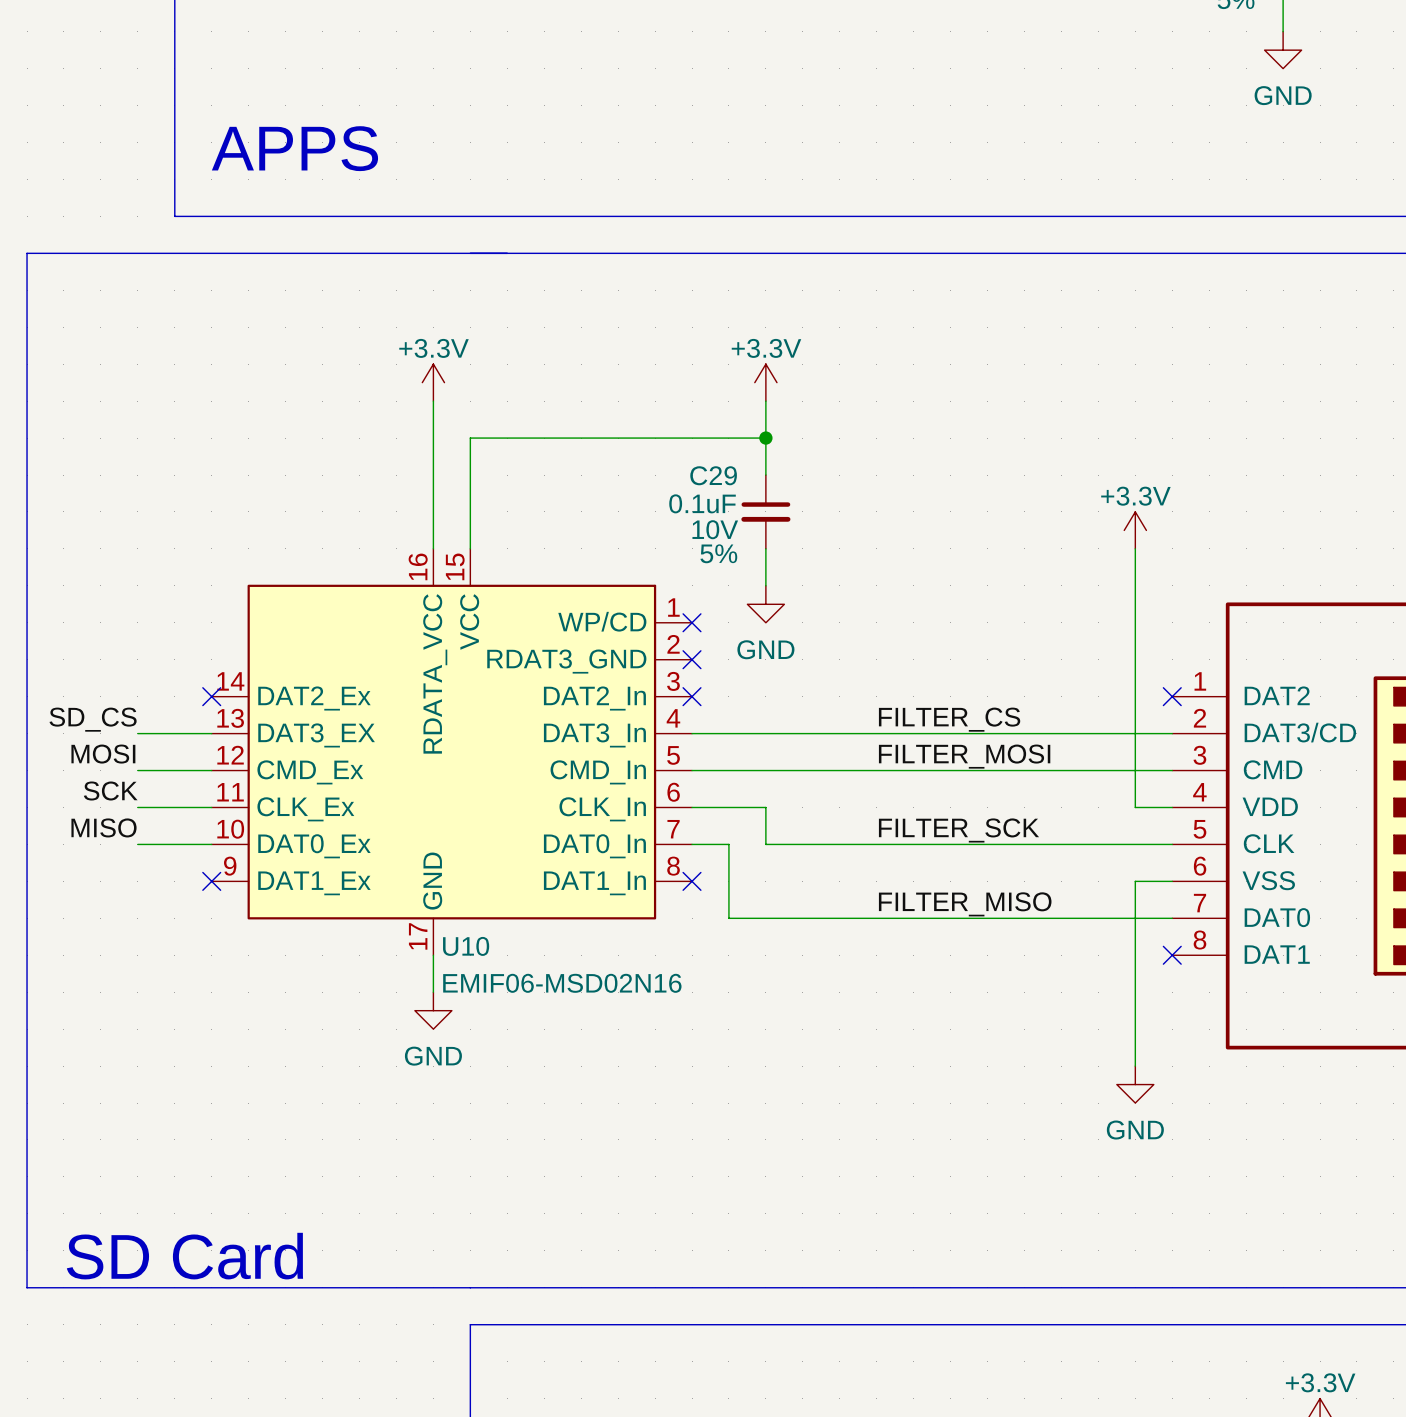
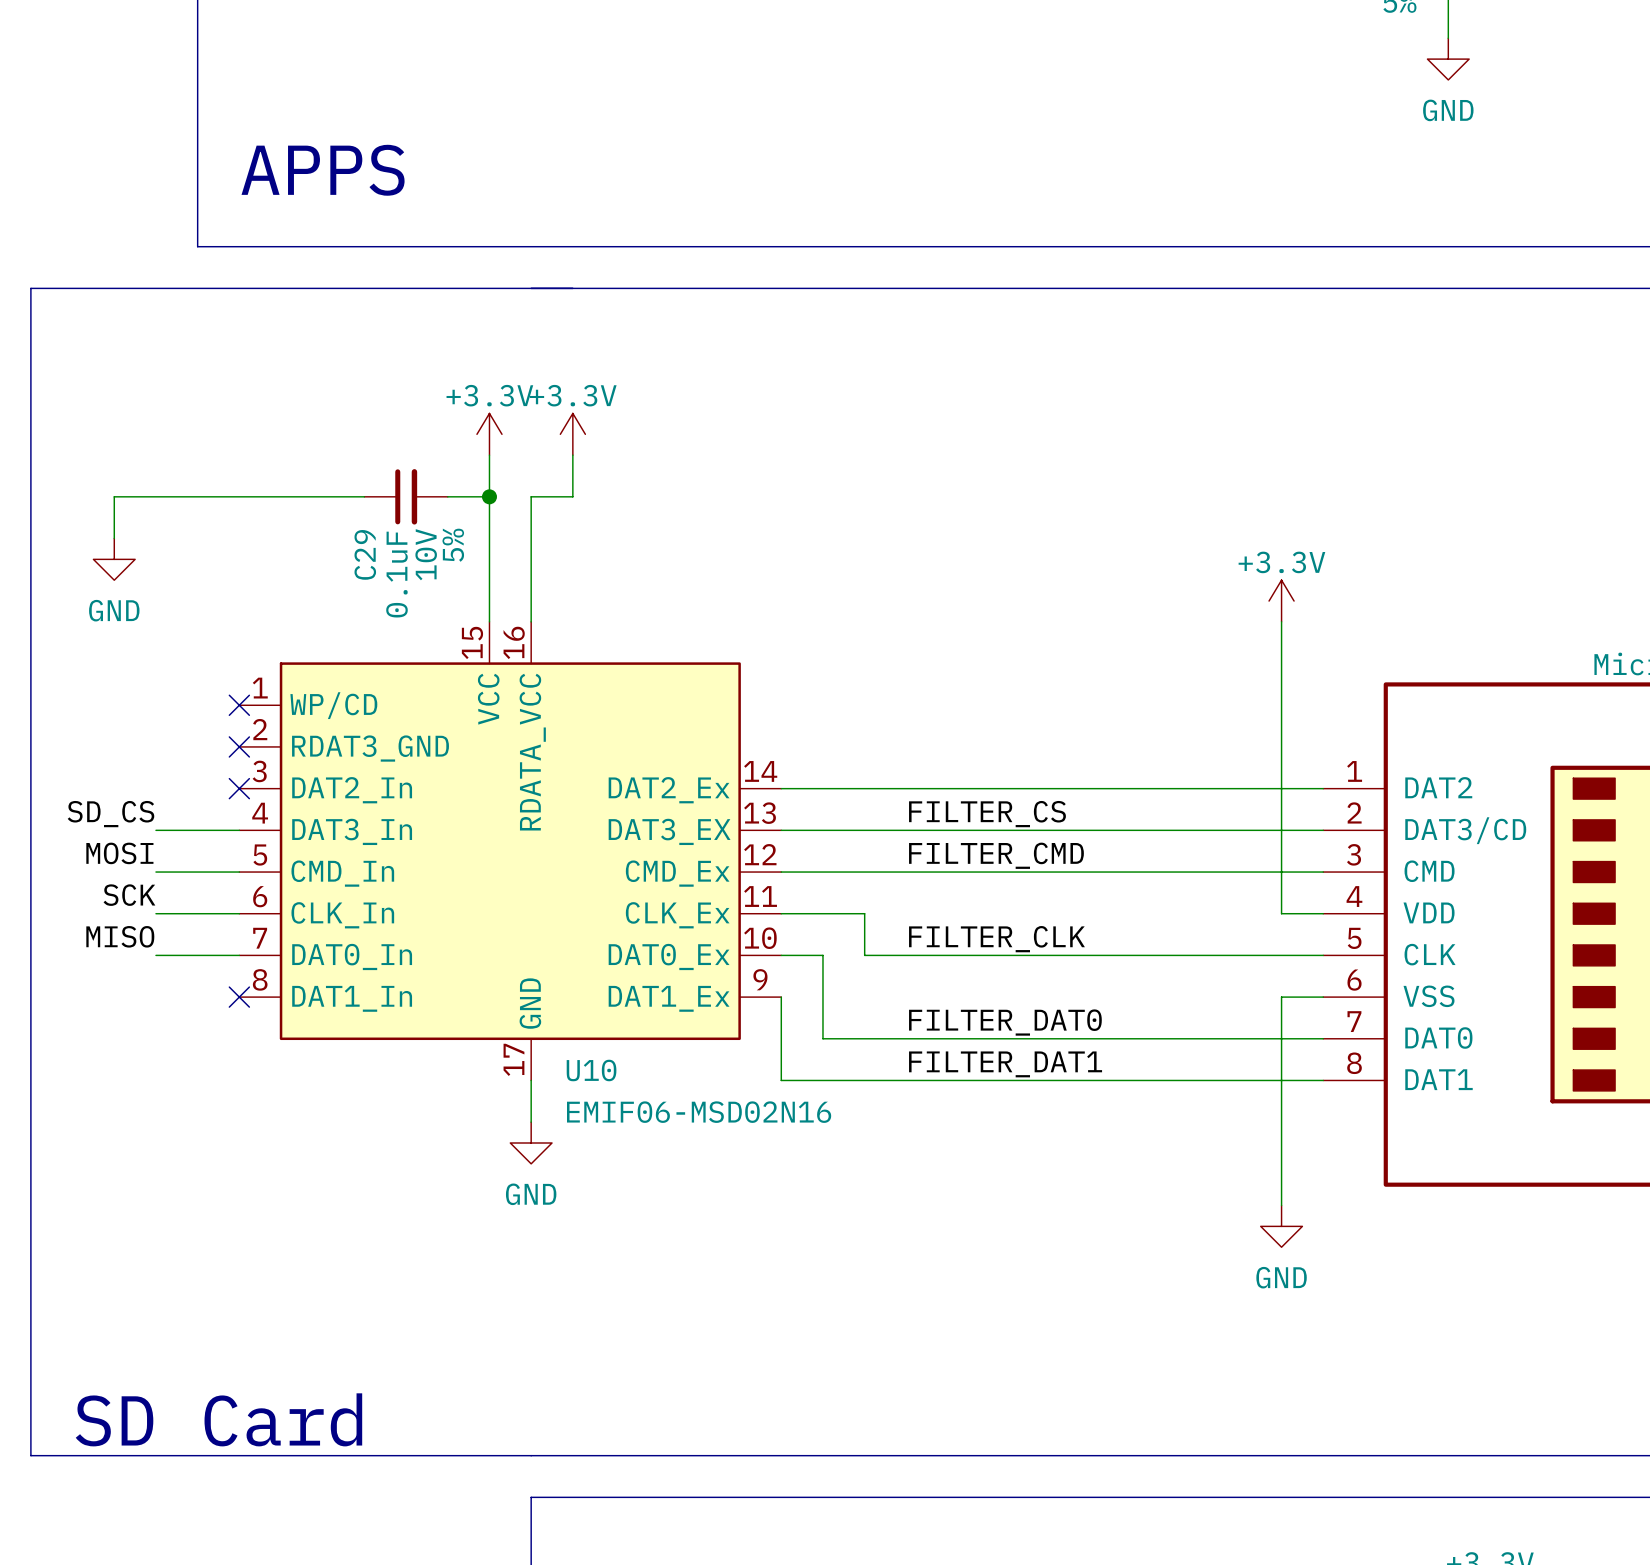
power symbol position: +3.3V (765, 382) -> +3.3V (572, 434)
wire: (765, 401) (765, 475) -> none
wire: none -> (364, 496) (114, 496) (114, 538)
wire: none -> (447, 496) (489, 496)
junction: none -> (489, 496)
wire: (507, 438) (765, 438) -> (572, 496) (572, 455)
junction: (765, 438) -> none
power symbol: none -> GND (114, 559)
C29 position: (765, 511) -> (406, 496)
C29 rotation: 0° (765, 512) -> 90° counterclockwise (406, 496)
wire: (765, 548) (765, 585) -> none
power symbol: GND (765, 604) -> none
no-connect mark: none -> (239, 705)
no-connect mark: (692, 622) -> none
no-connect mark: none -> (239, 746)
no-connect mark: (692, 659) -> none
wire: none -> (781, 788) (1323, 788)
no-connect mark: (692, 696) -> none
no-connect mark: (1172, 696) -> none
label position: FILTER_CS (949, 719) -> FILTER_CS (987, 814)
U10 flip: as is (451, 752) -> left-right (510, 851)
label: FILTER_MOSI (964, 756) -> FILTER_CMD (996, 855)
label: FILTER_SCK (958, 830) -> FILTER_CLK (996, 939)
wire: none -> (781, 997) (781, 1080) (1323, 1080)
no-connect mark: (692, 881) -> none
label: none -> FILTER_DAT0 (1005, 1022)
label: FILTER_MISO (965, 904) -> none
label: none -> FILTER_DAT1 (1005, 1064)
U10 name position: U10 (466, 946) -> U10 (591, 1070)
wire: (433, 955) (433, 992) -> (531, 1080) (531, 1122)
no-connect mark: (1172, 955) -> none
U10 value position: EMIF06-MSD02N16 (562, 983) -> EMIF06-MSD02N16 (699, 1112)
power symbol position: GND (433, 1010) -> GND (531, 1143)

